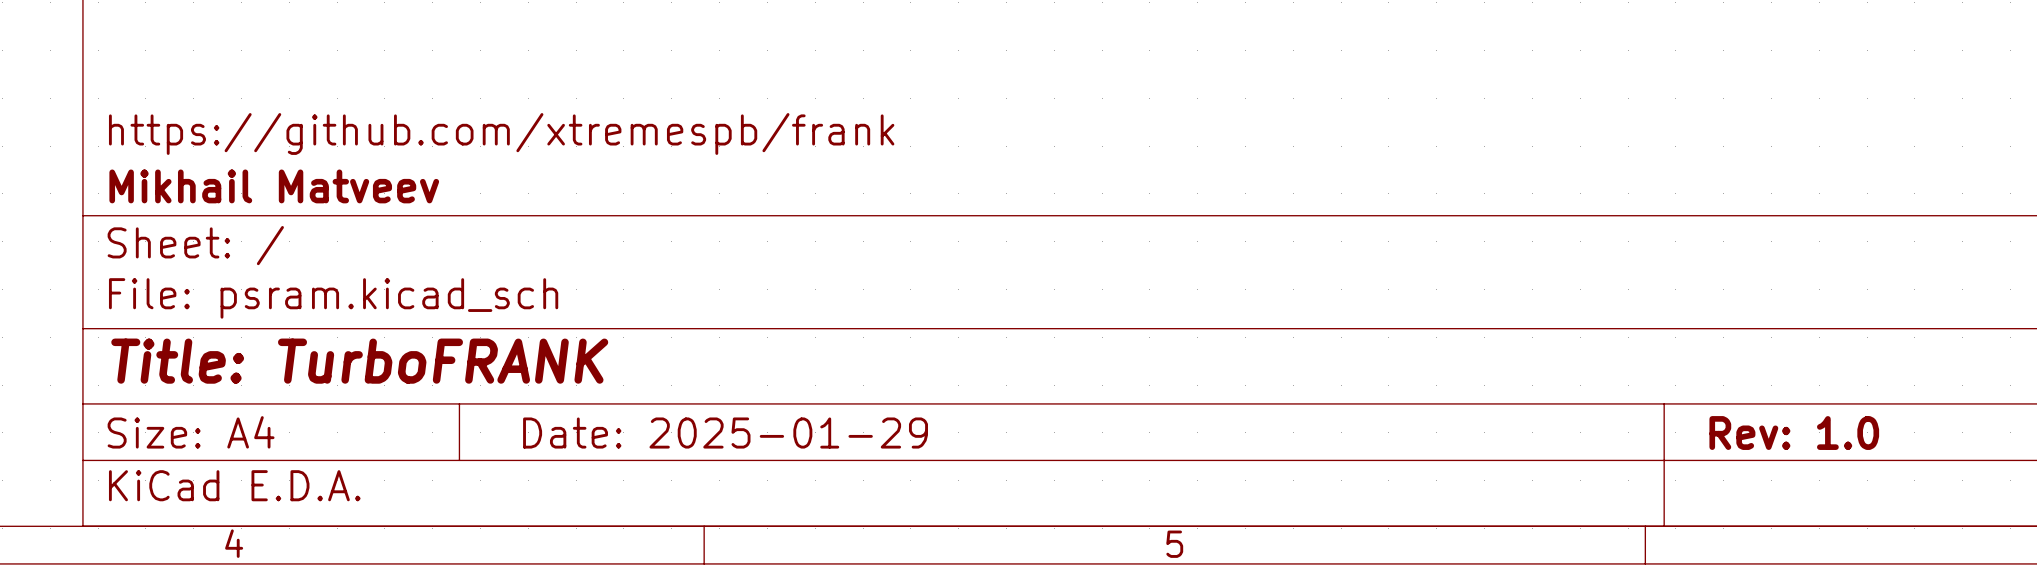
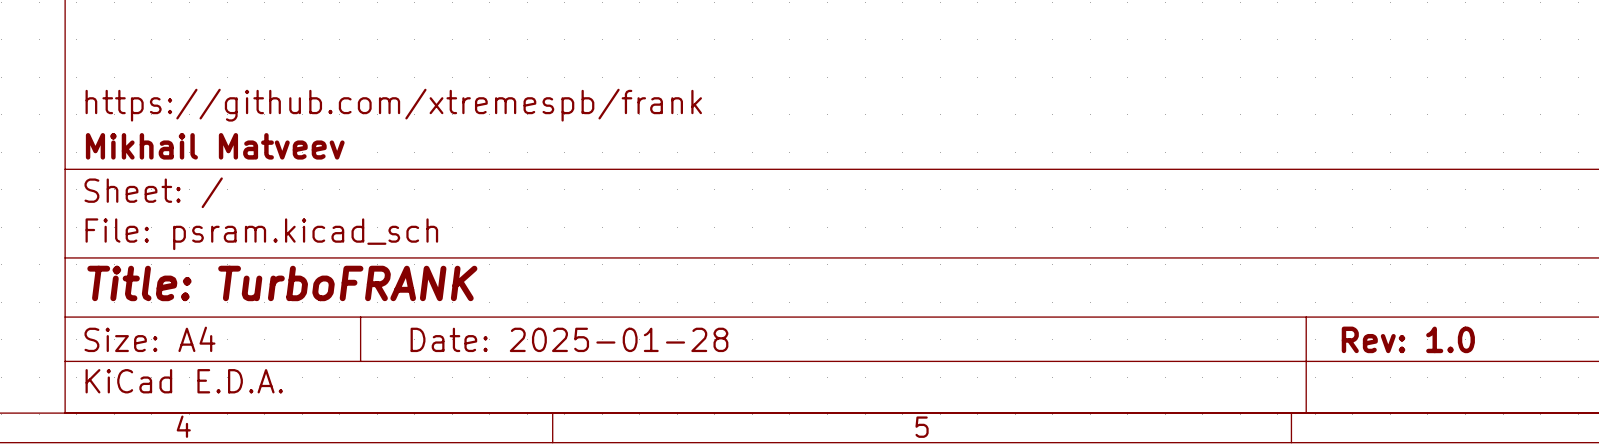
title block: Date: 2025-01-29 (725, 433) -> Date: 2025-01-28 (569, 339)

